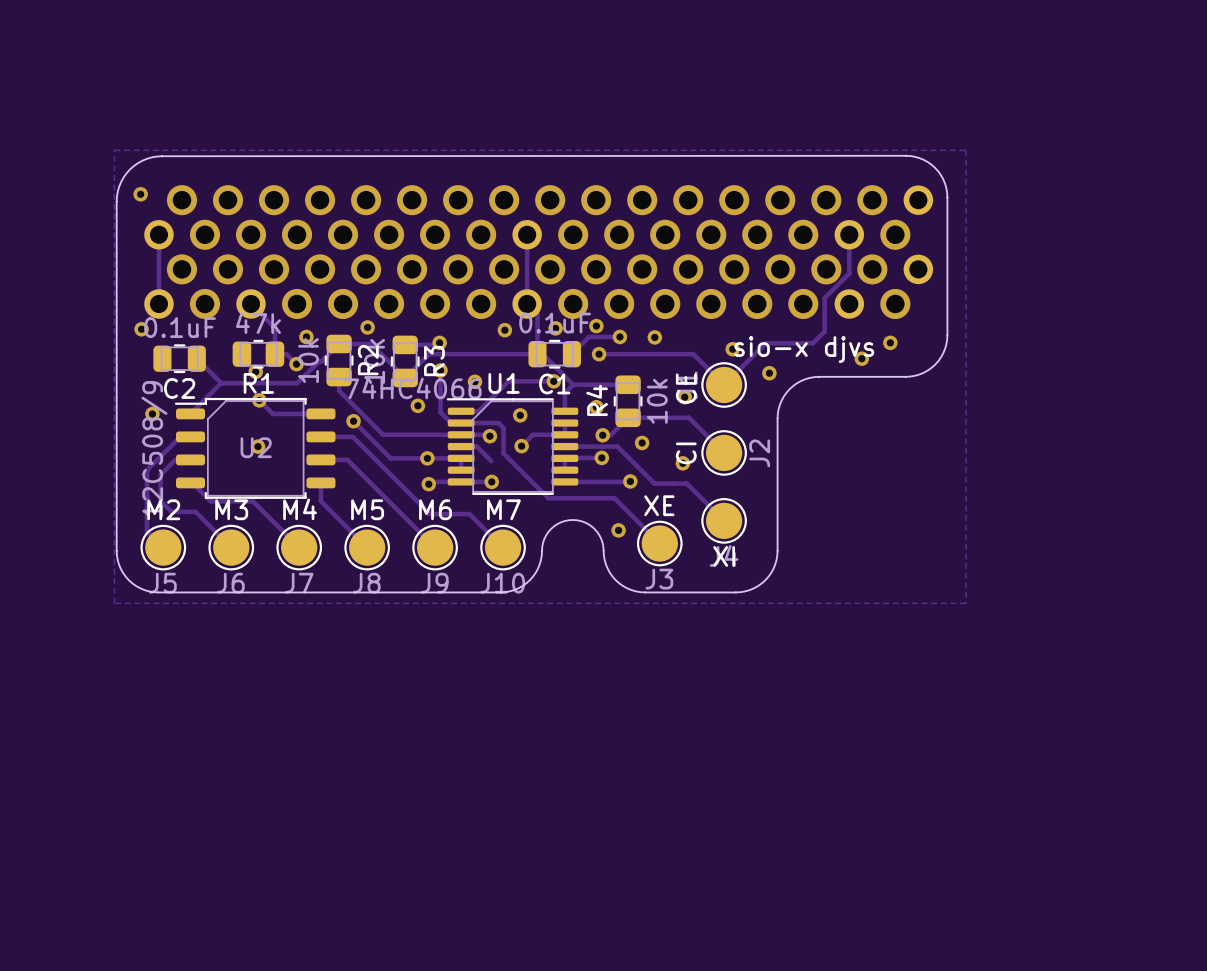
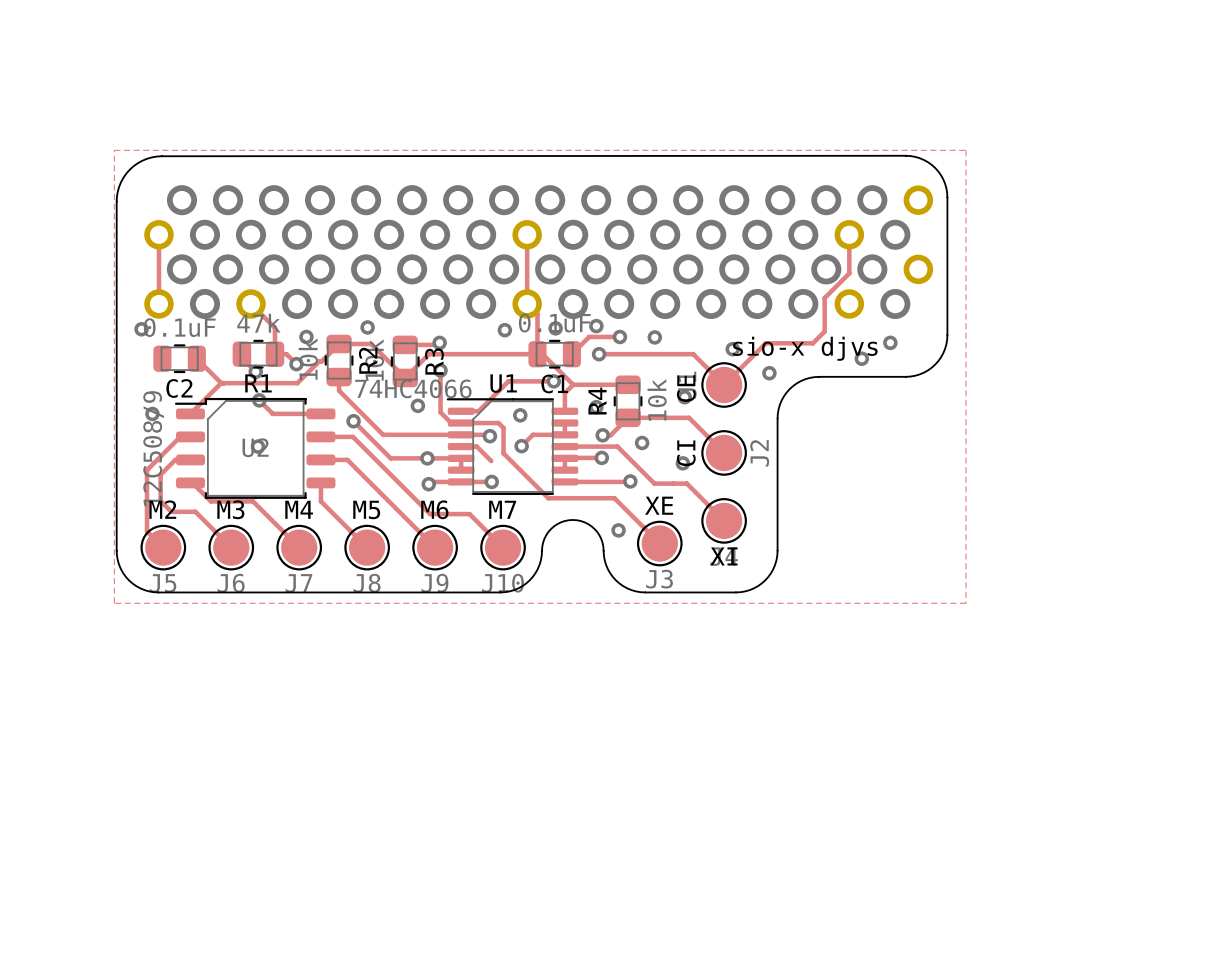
via: (140, 194) -> none
via: (474, 381) -> none

